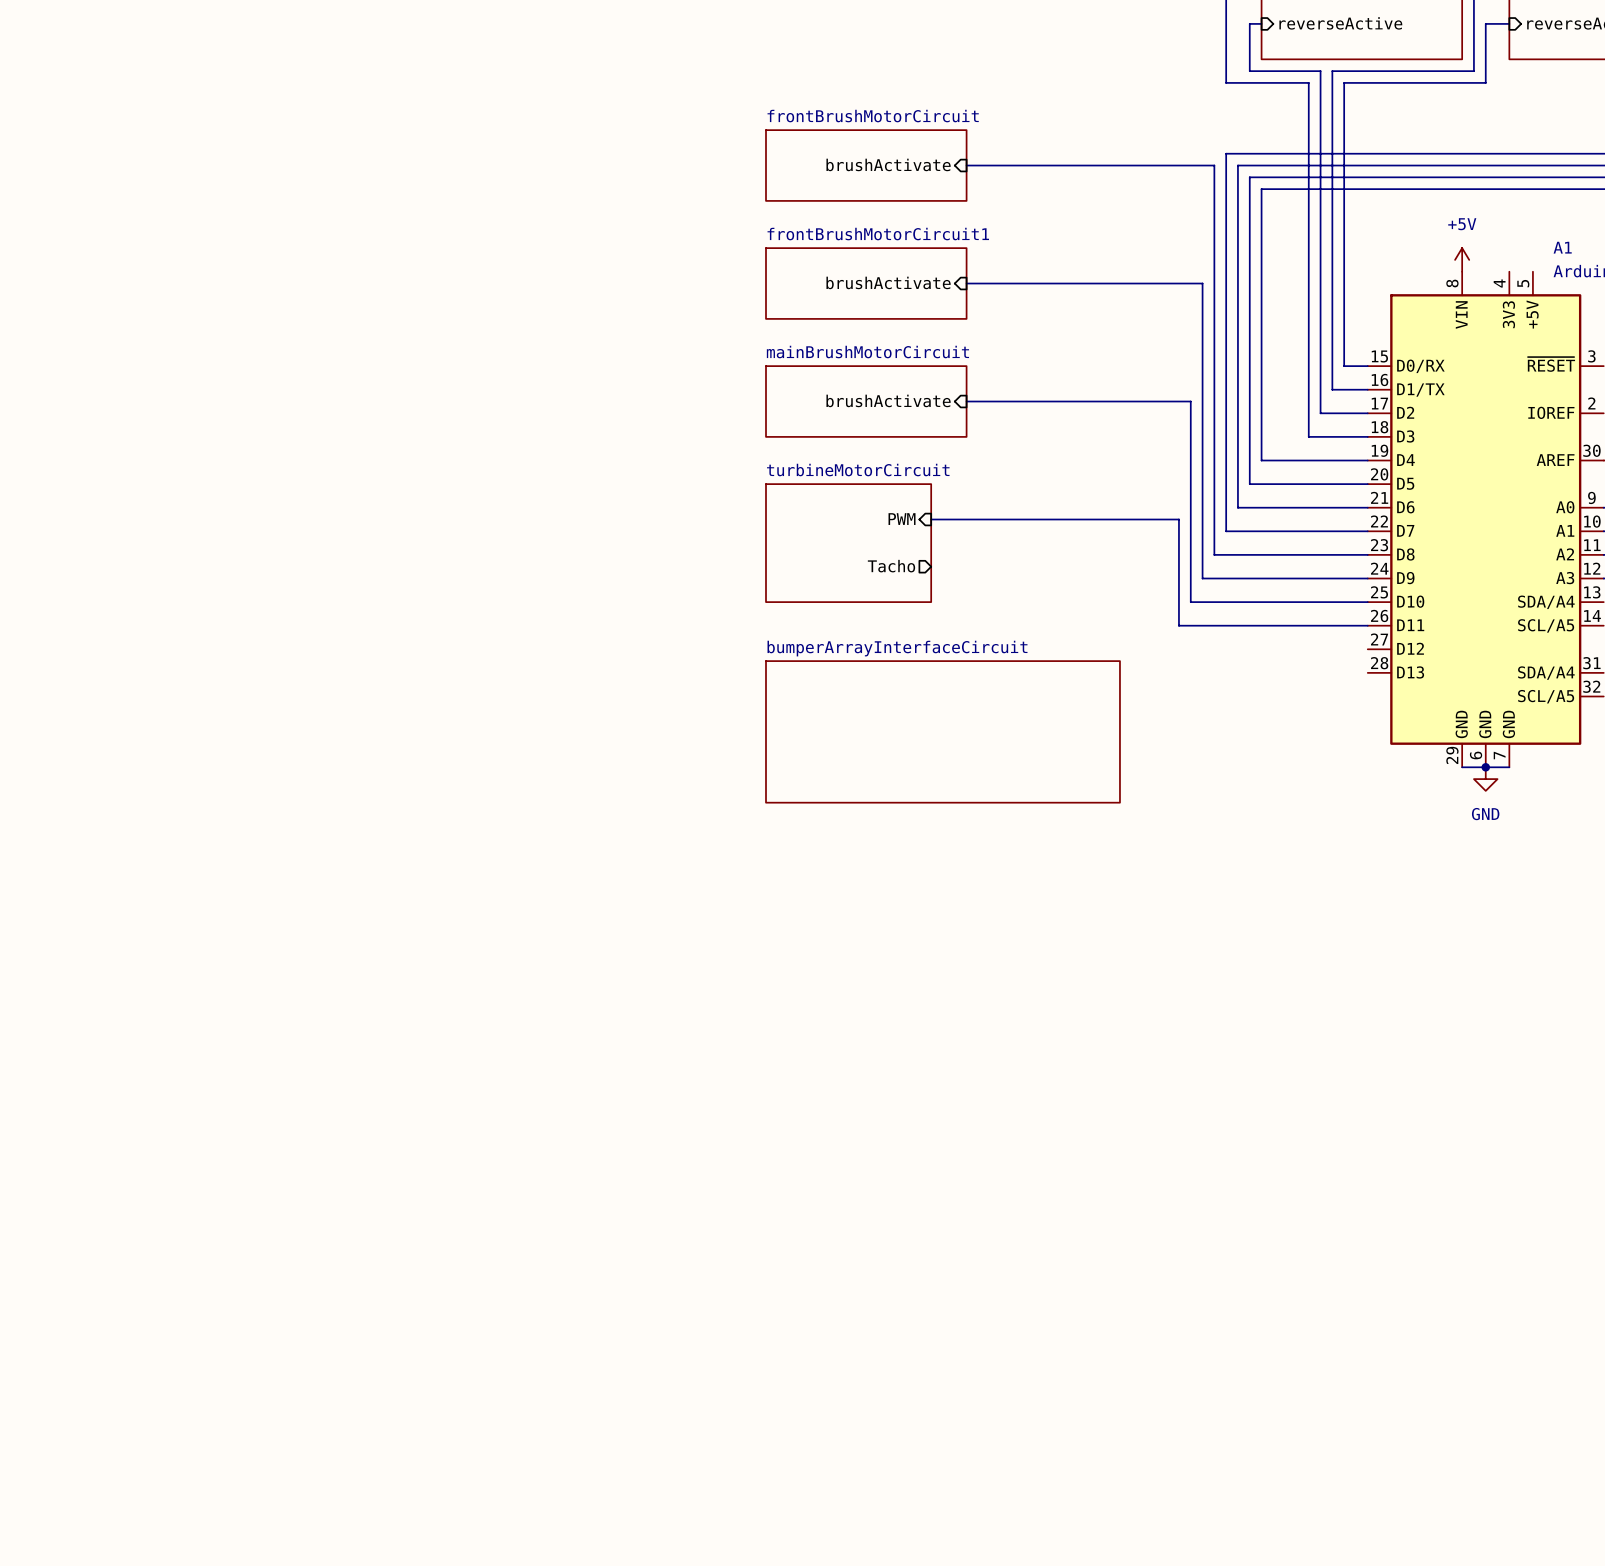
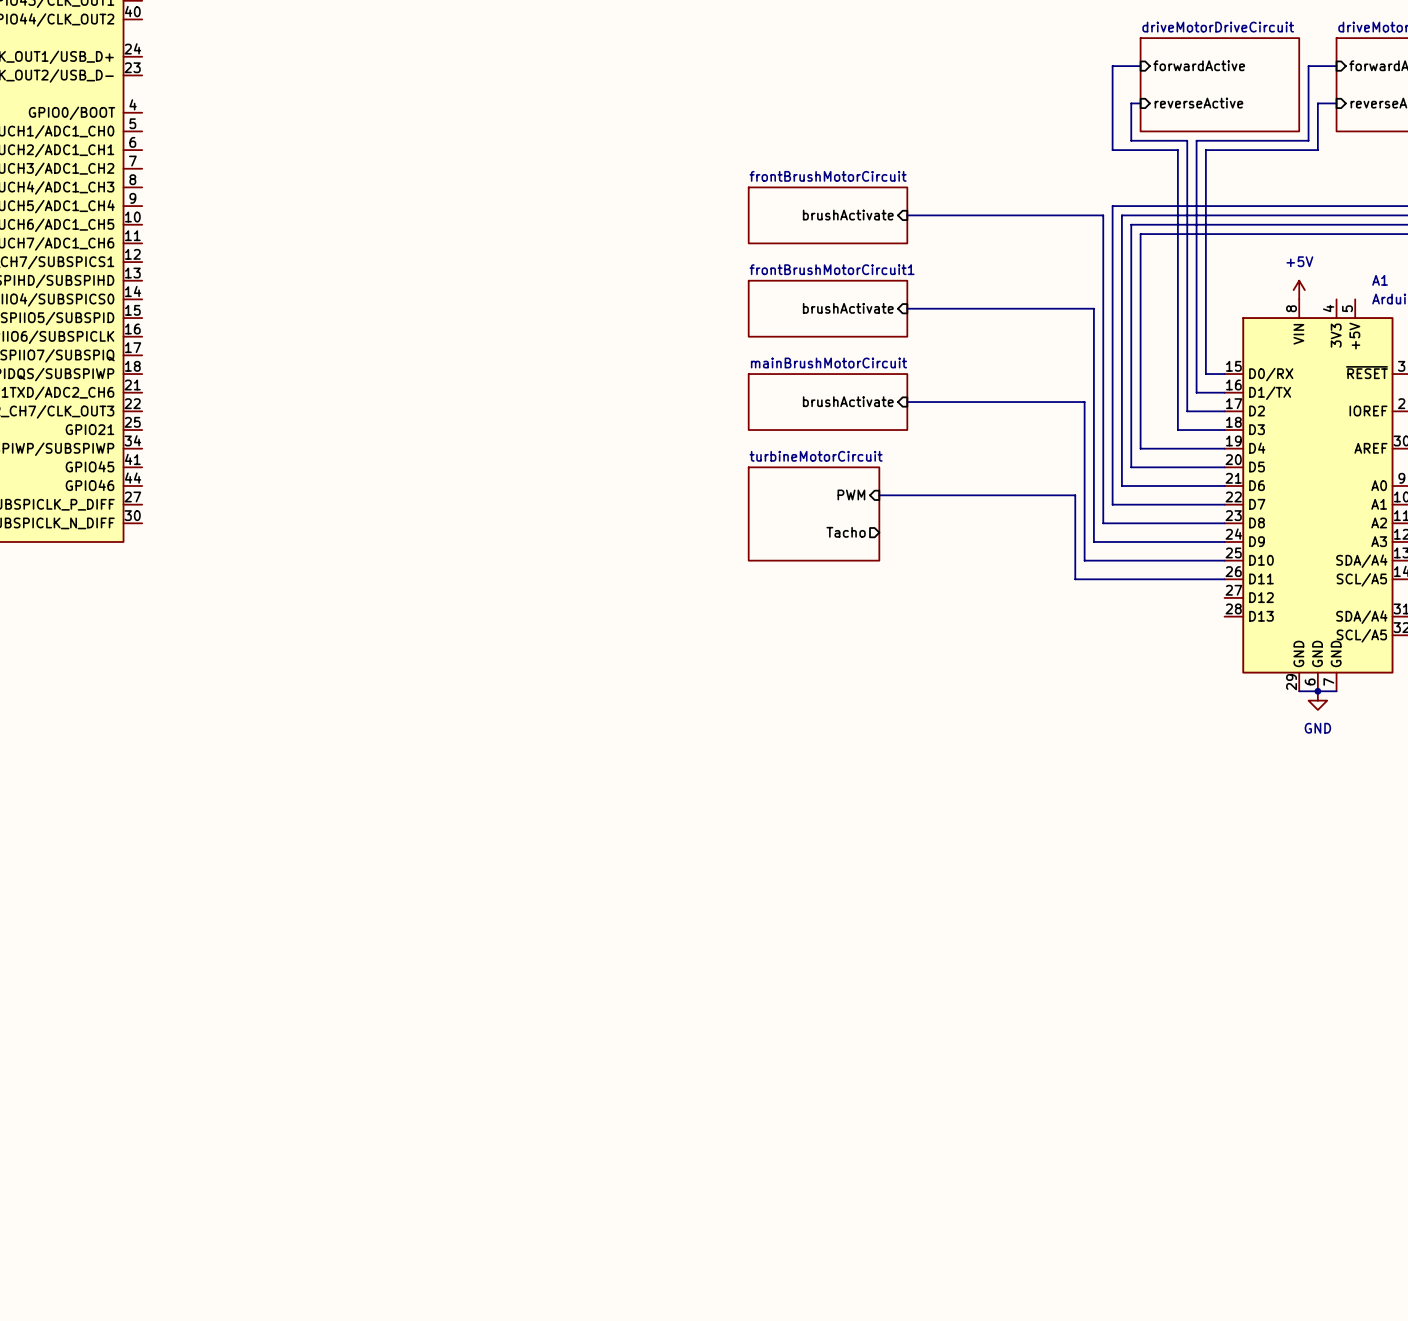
sheet bumperArrayInterfaceCircuit: (942, 731) -> none

